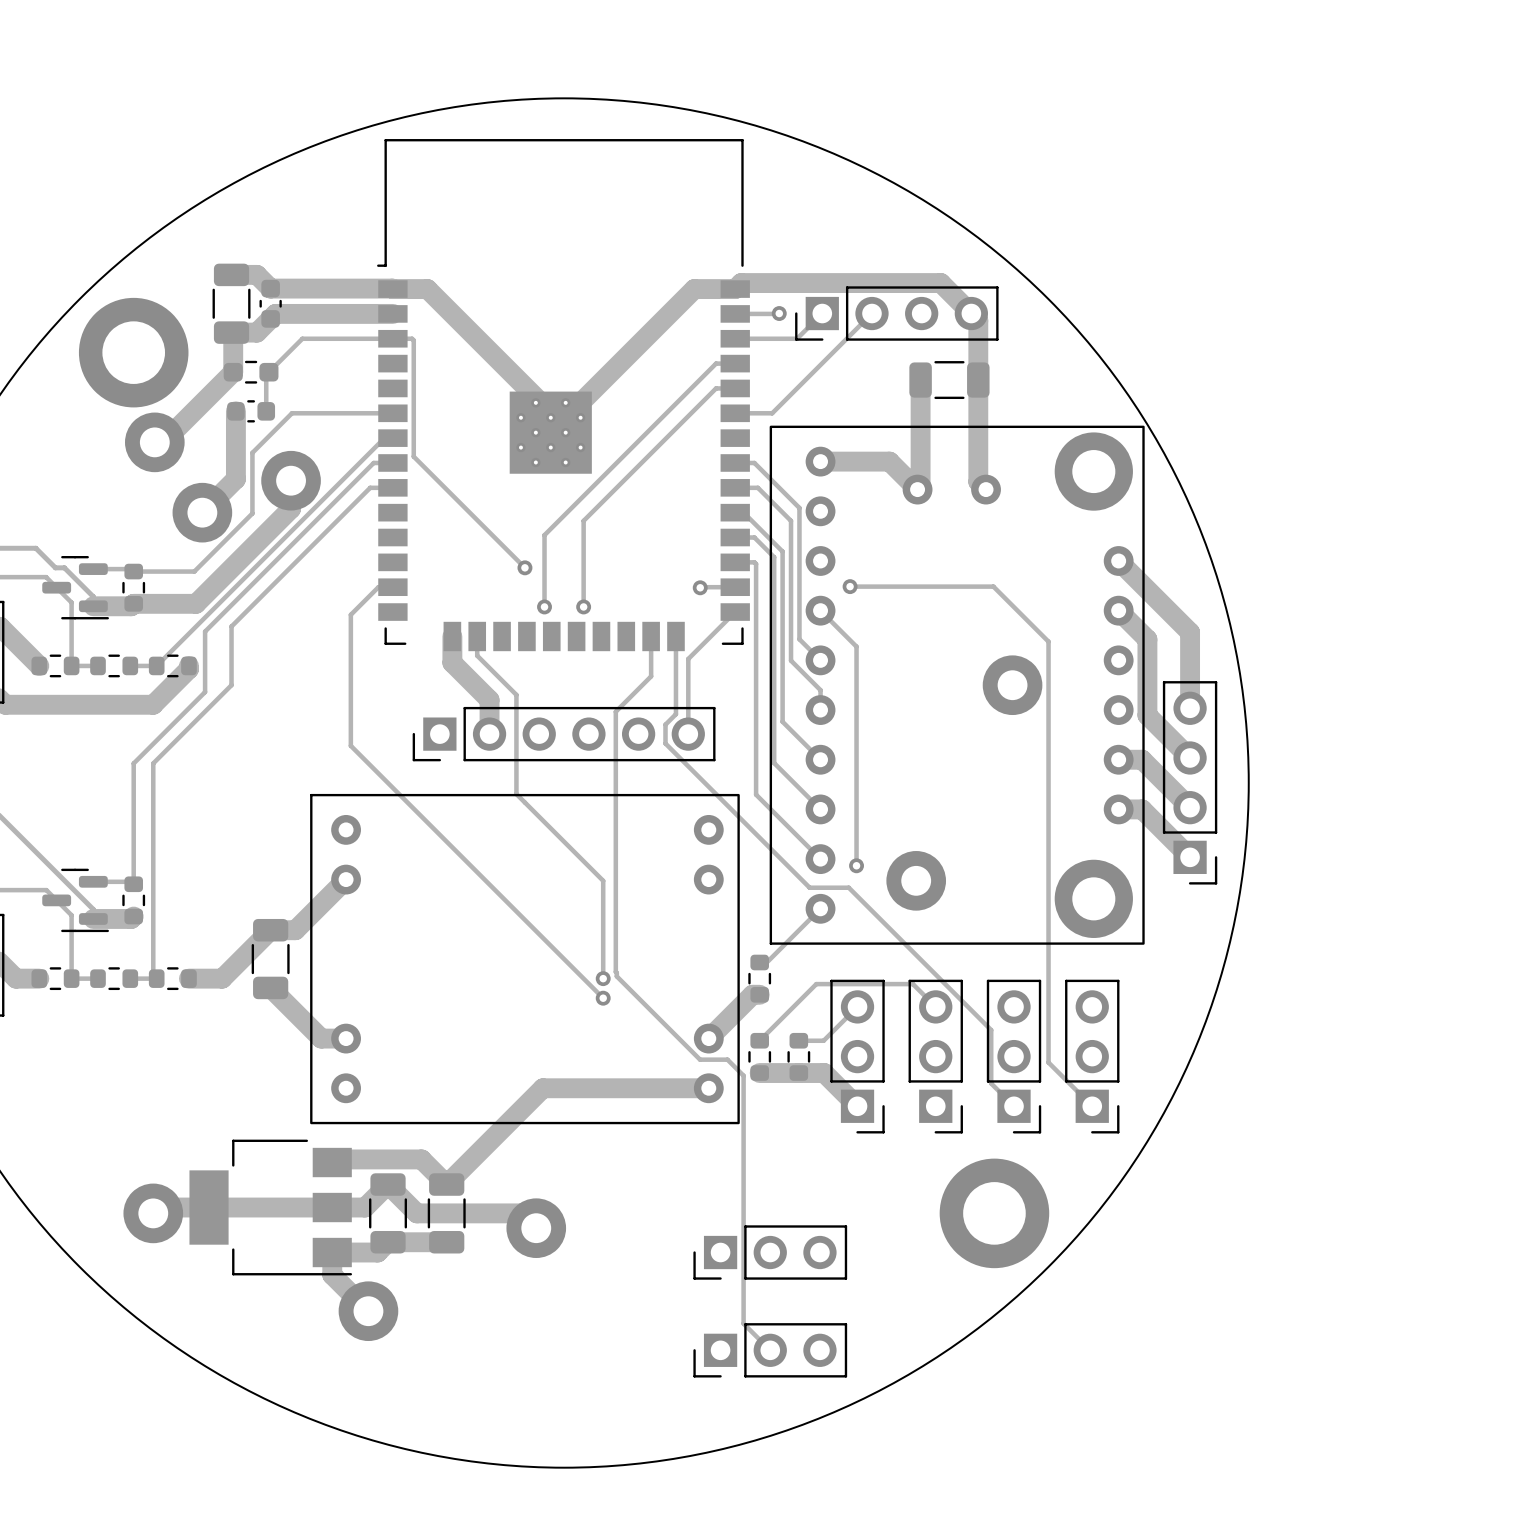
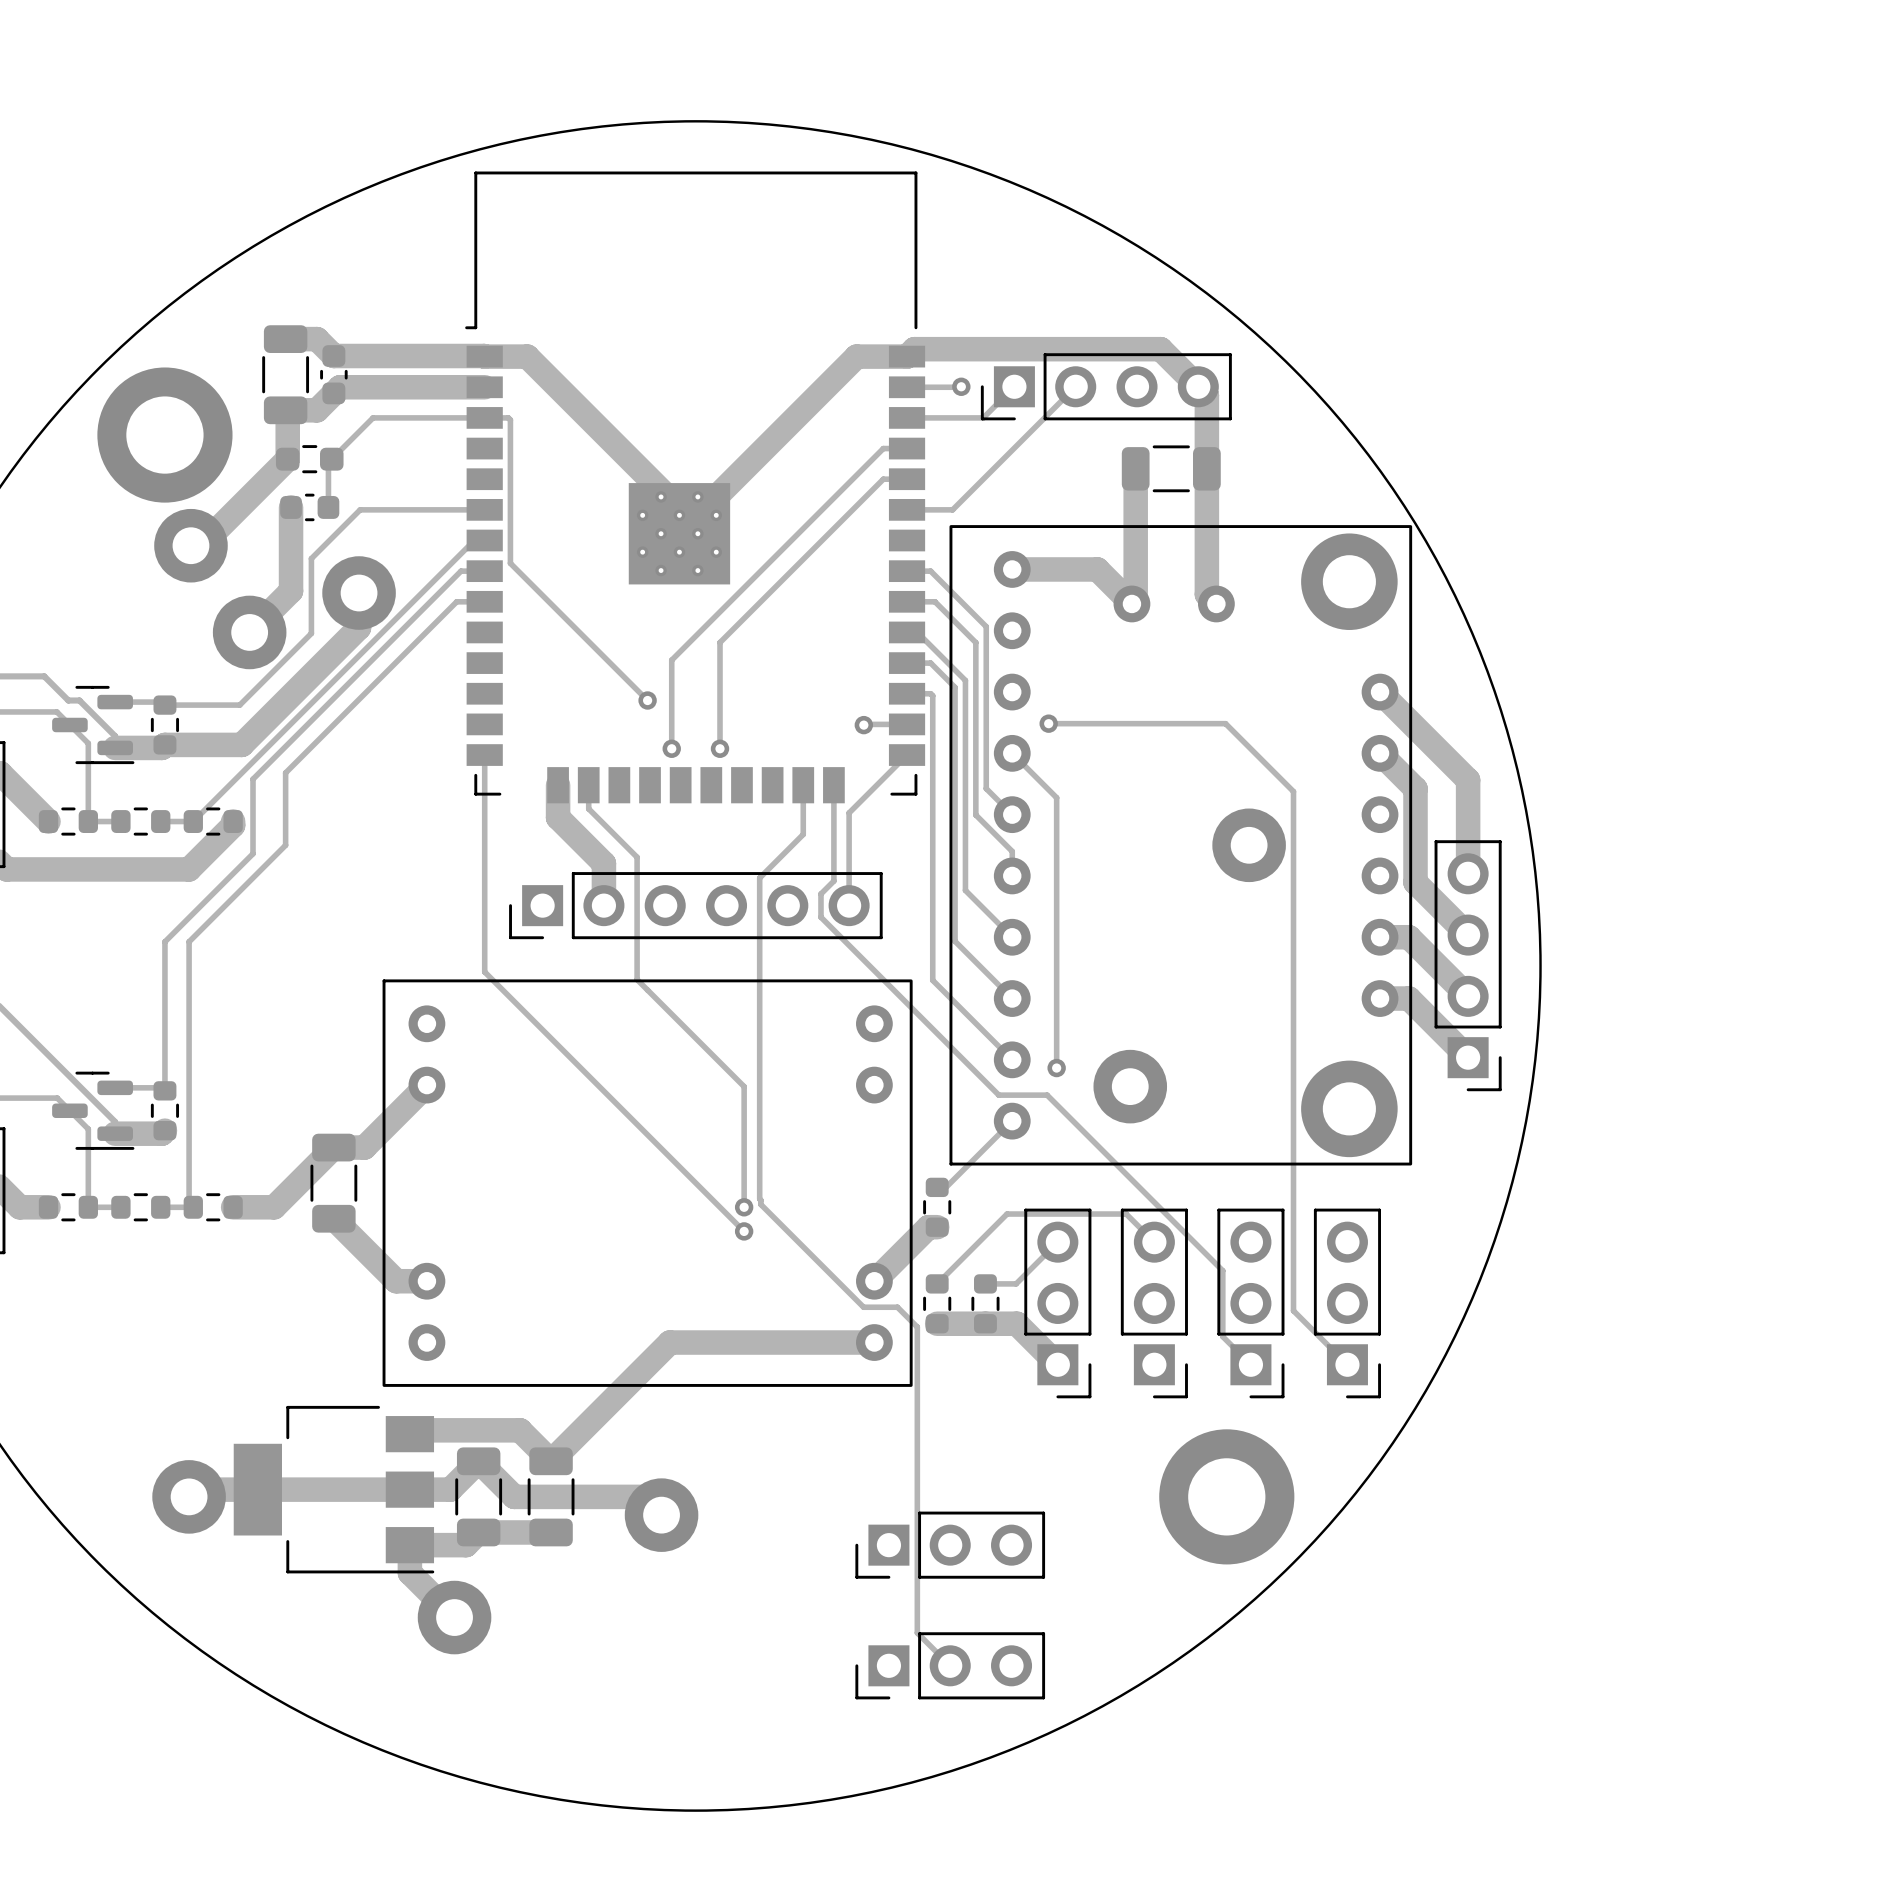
track: (392, 587) (378, 587) (350, 614) (350, 745) (392, 787) -> (484, 755) (484, 971)

